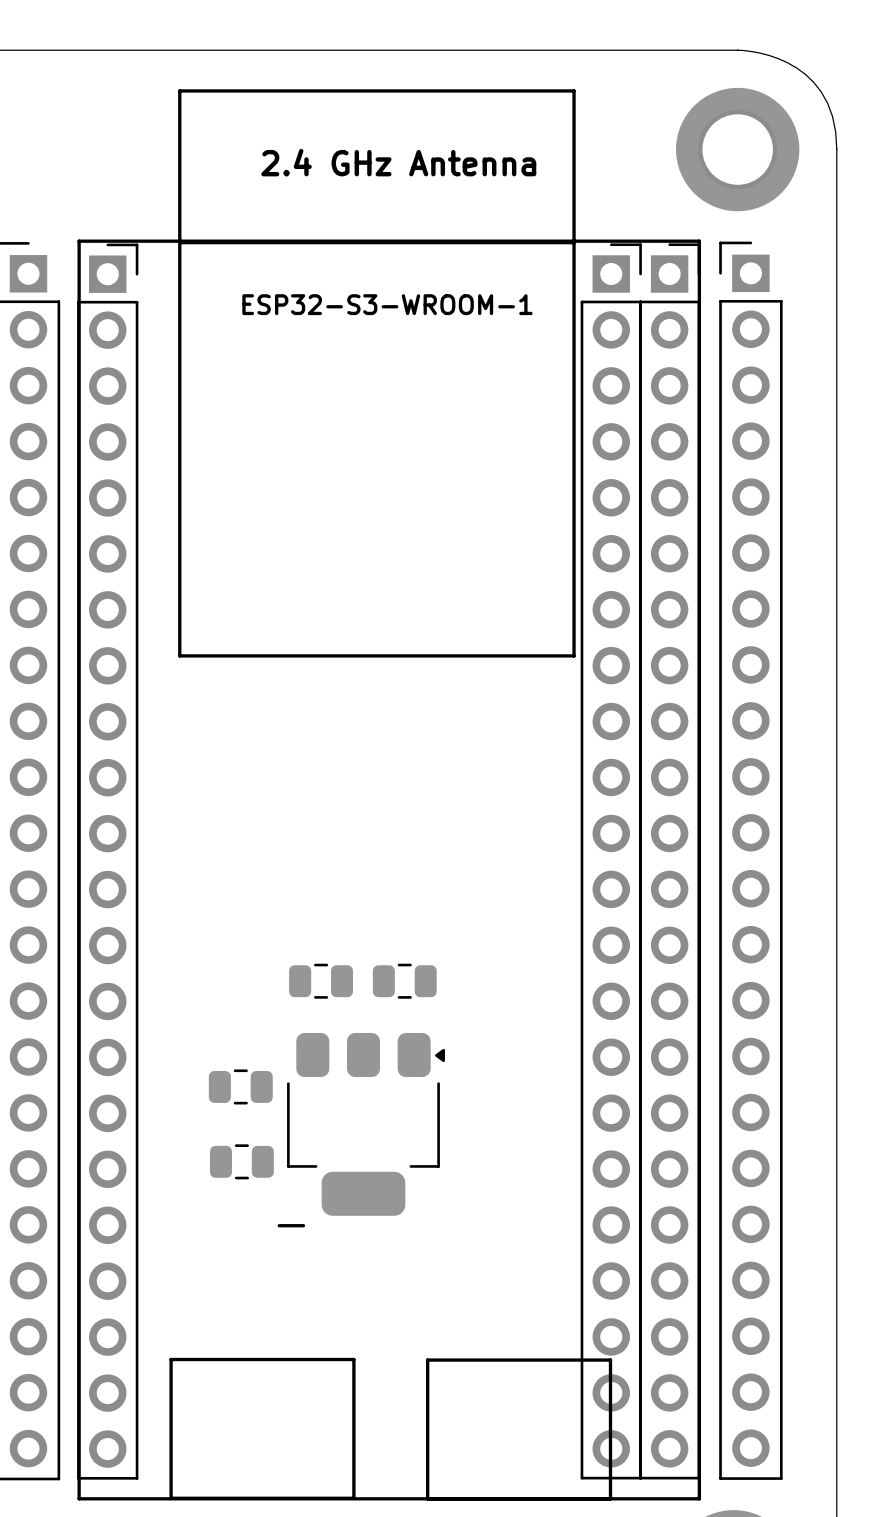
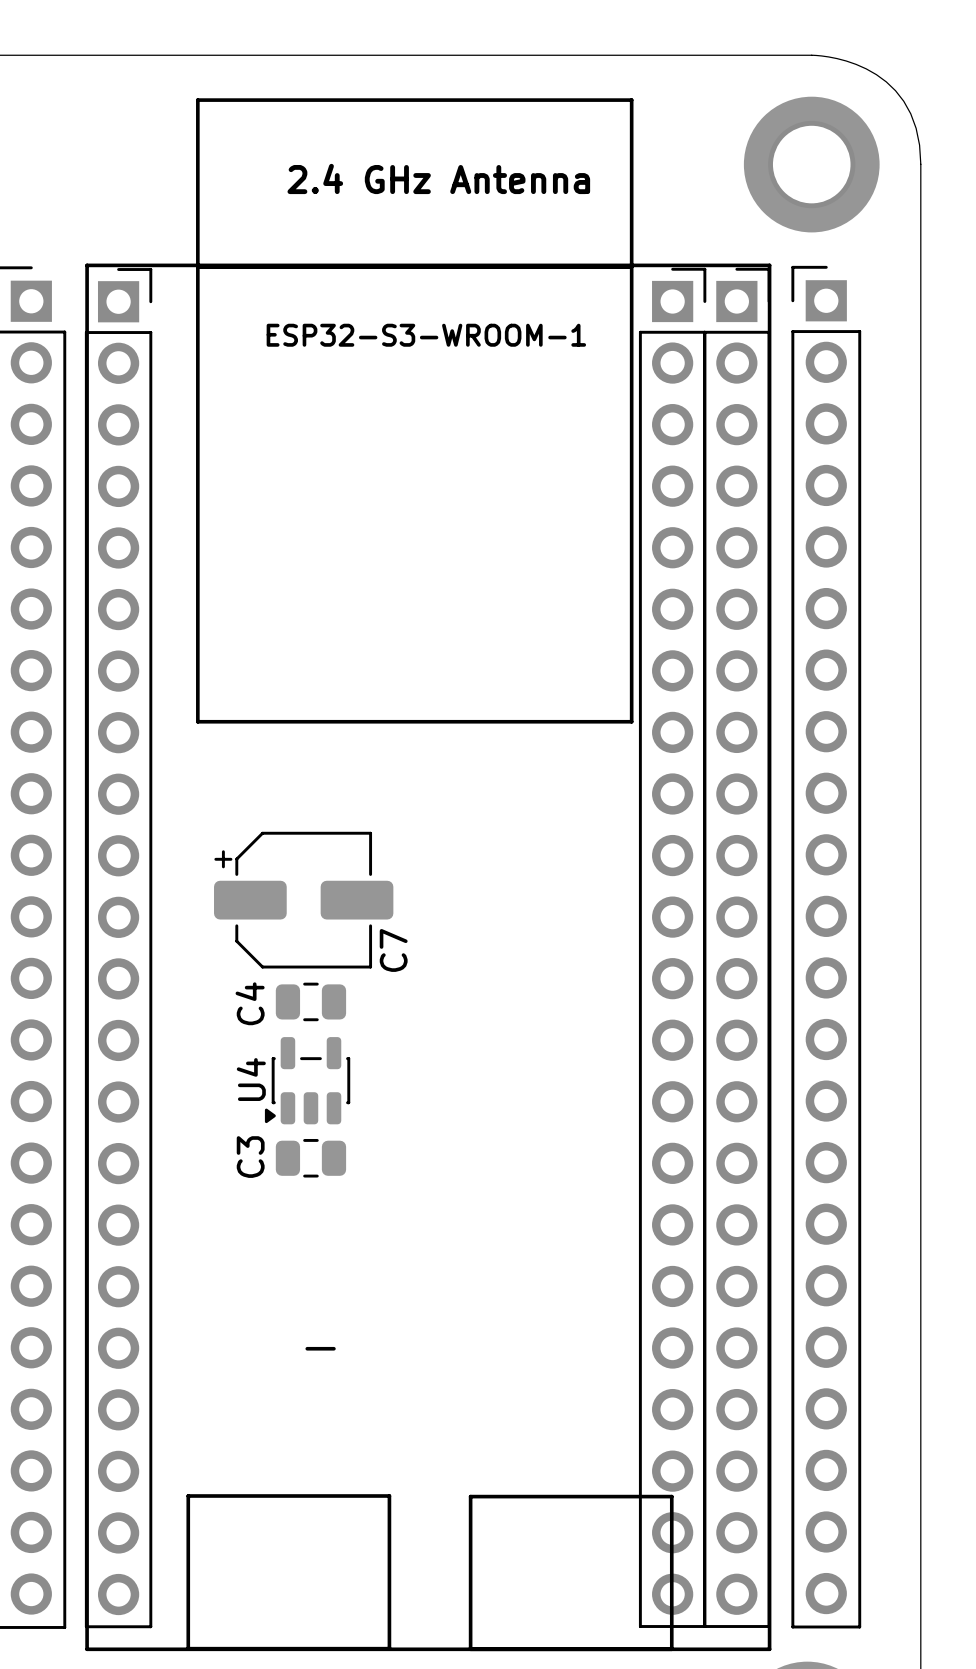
C7: none -> (303, 900)
C4: none -> (310, 1001)
part: (321, 981) -> none
part: (404, 981) -> none
U4: none -> (307, 1080)
C3: none -> (310, 1158)
part: (240, 1086) -> none
part: (366, 1124) -> none
part: (241, 1161) -> none

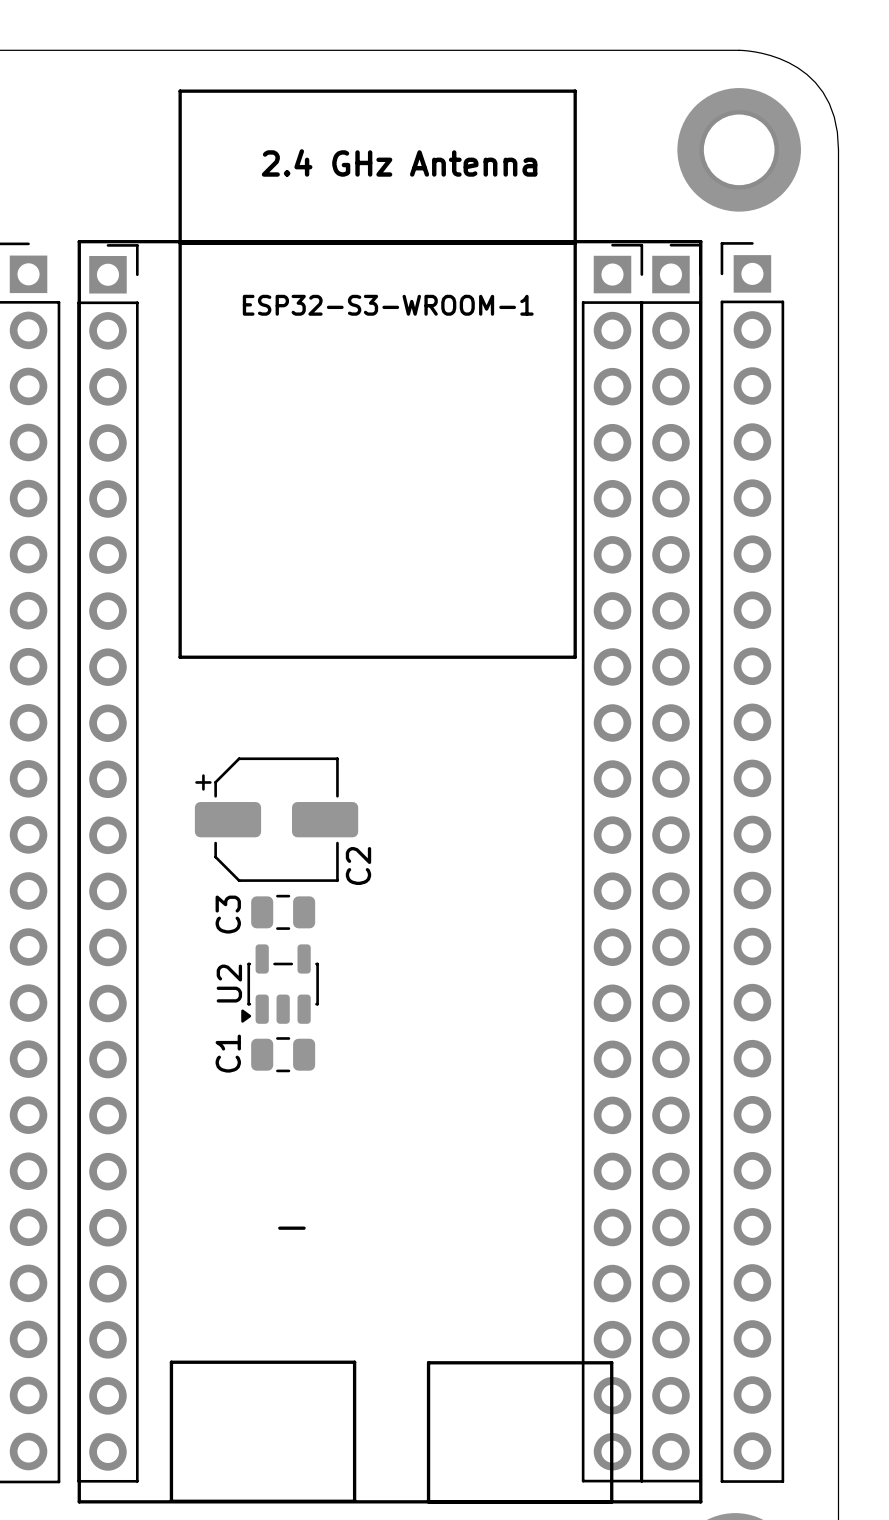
C7 name: C7 (393, 950) -> C2 (358, 866)
C4 name: C4 (250, 1003) -> C3 (228, 914)
U4 name: U4 (251, 1079) -> U2 (229, 983)
C3 name: C3 (250, 1157) -> C1 (228, 1053)

